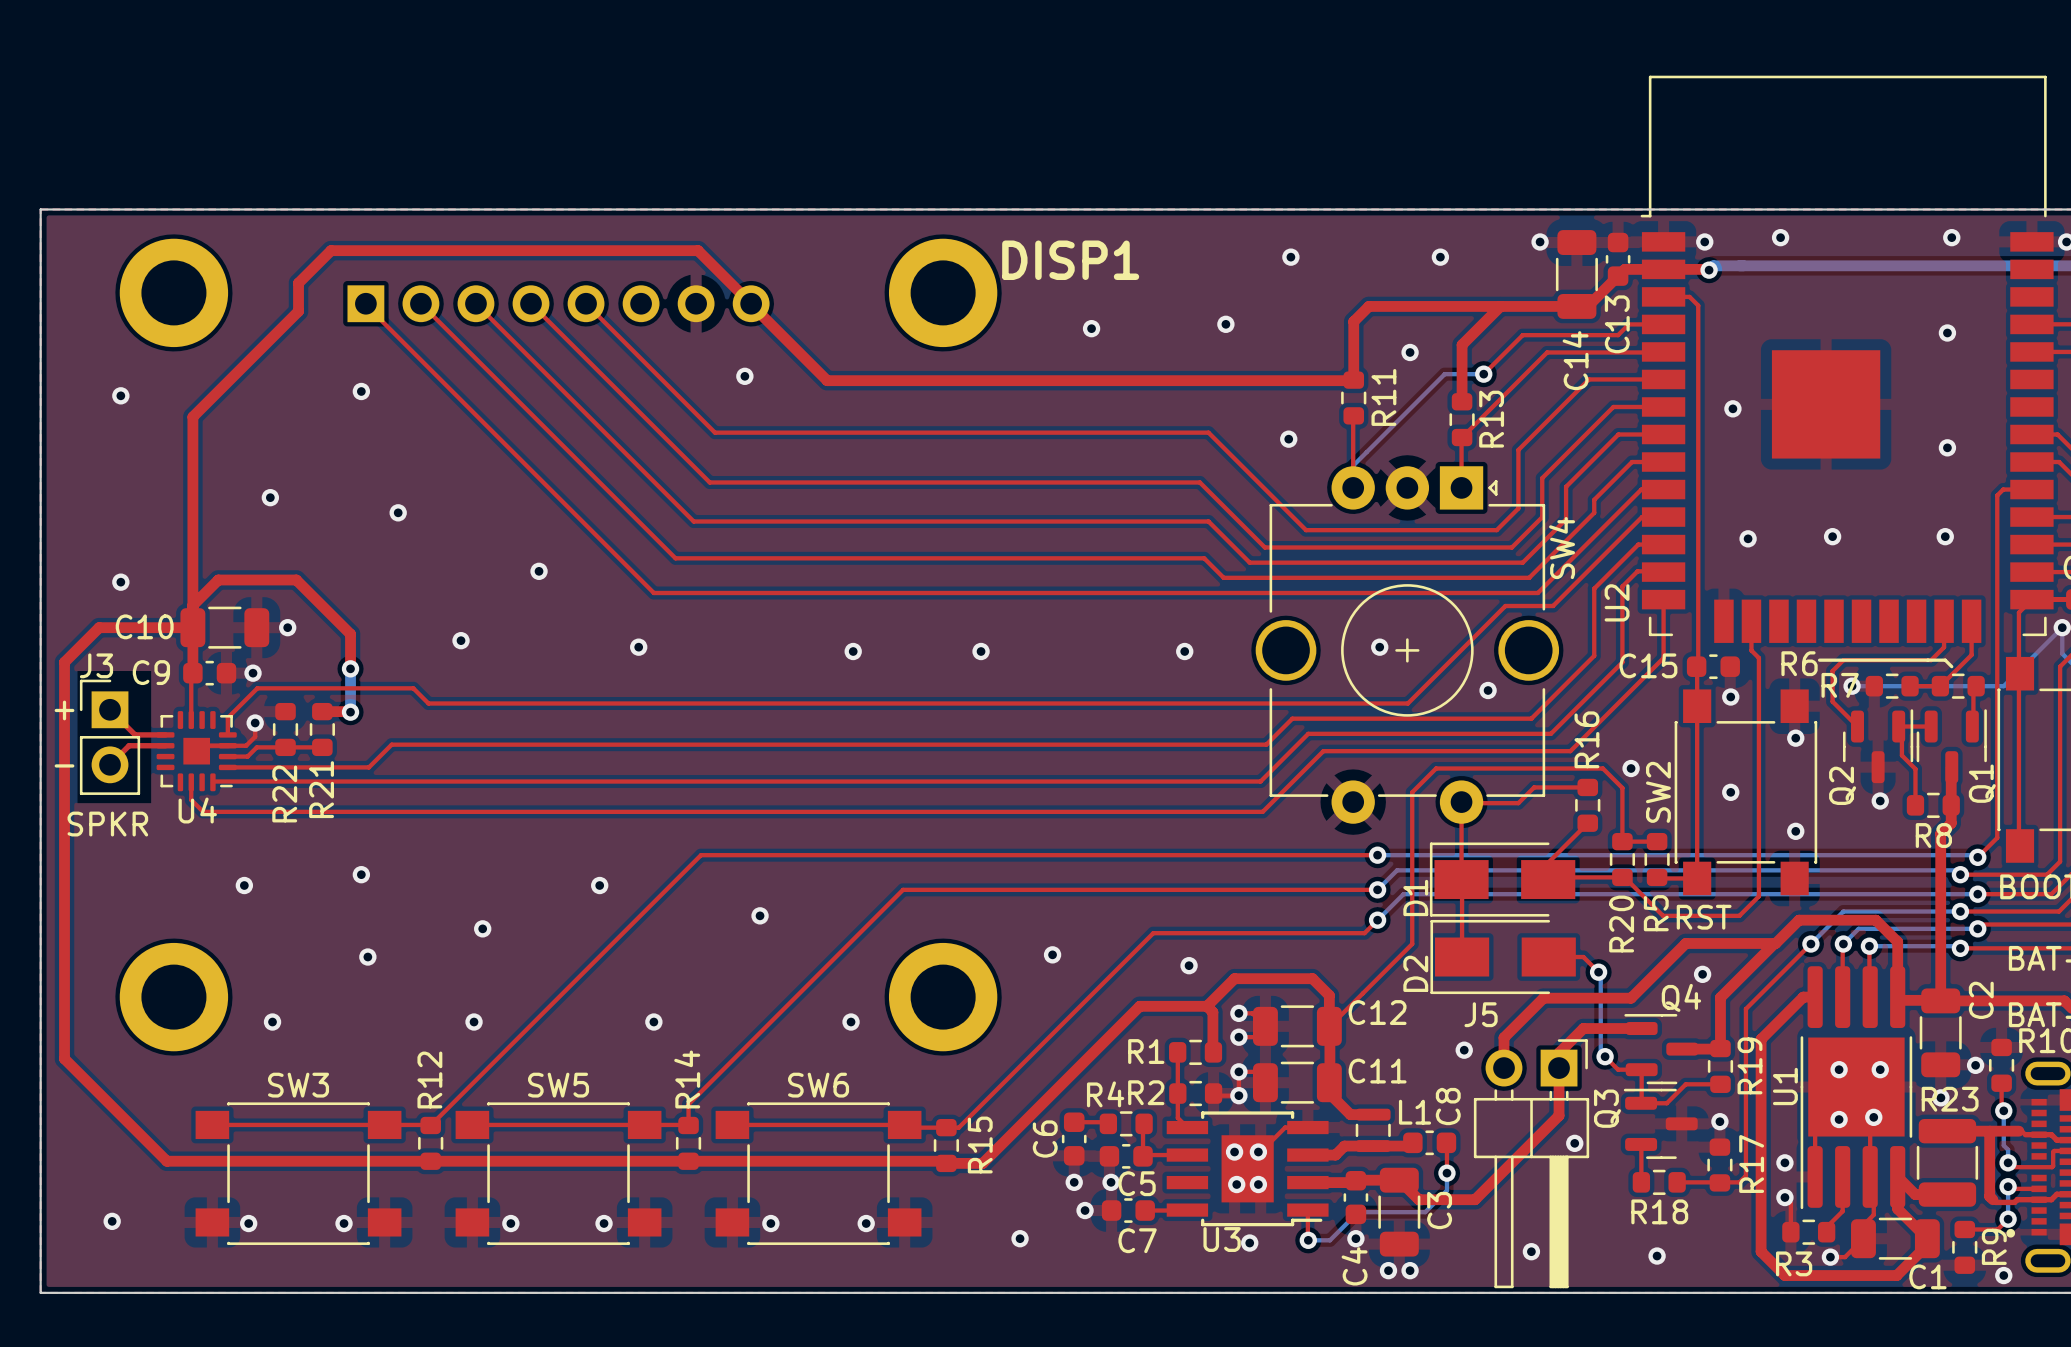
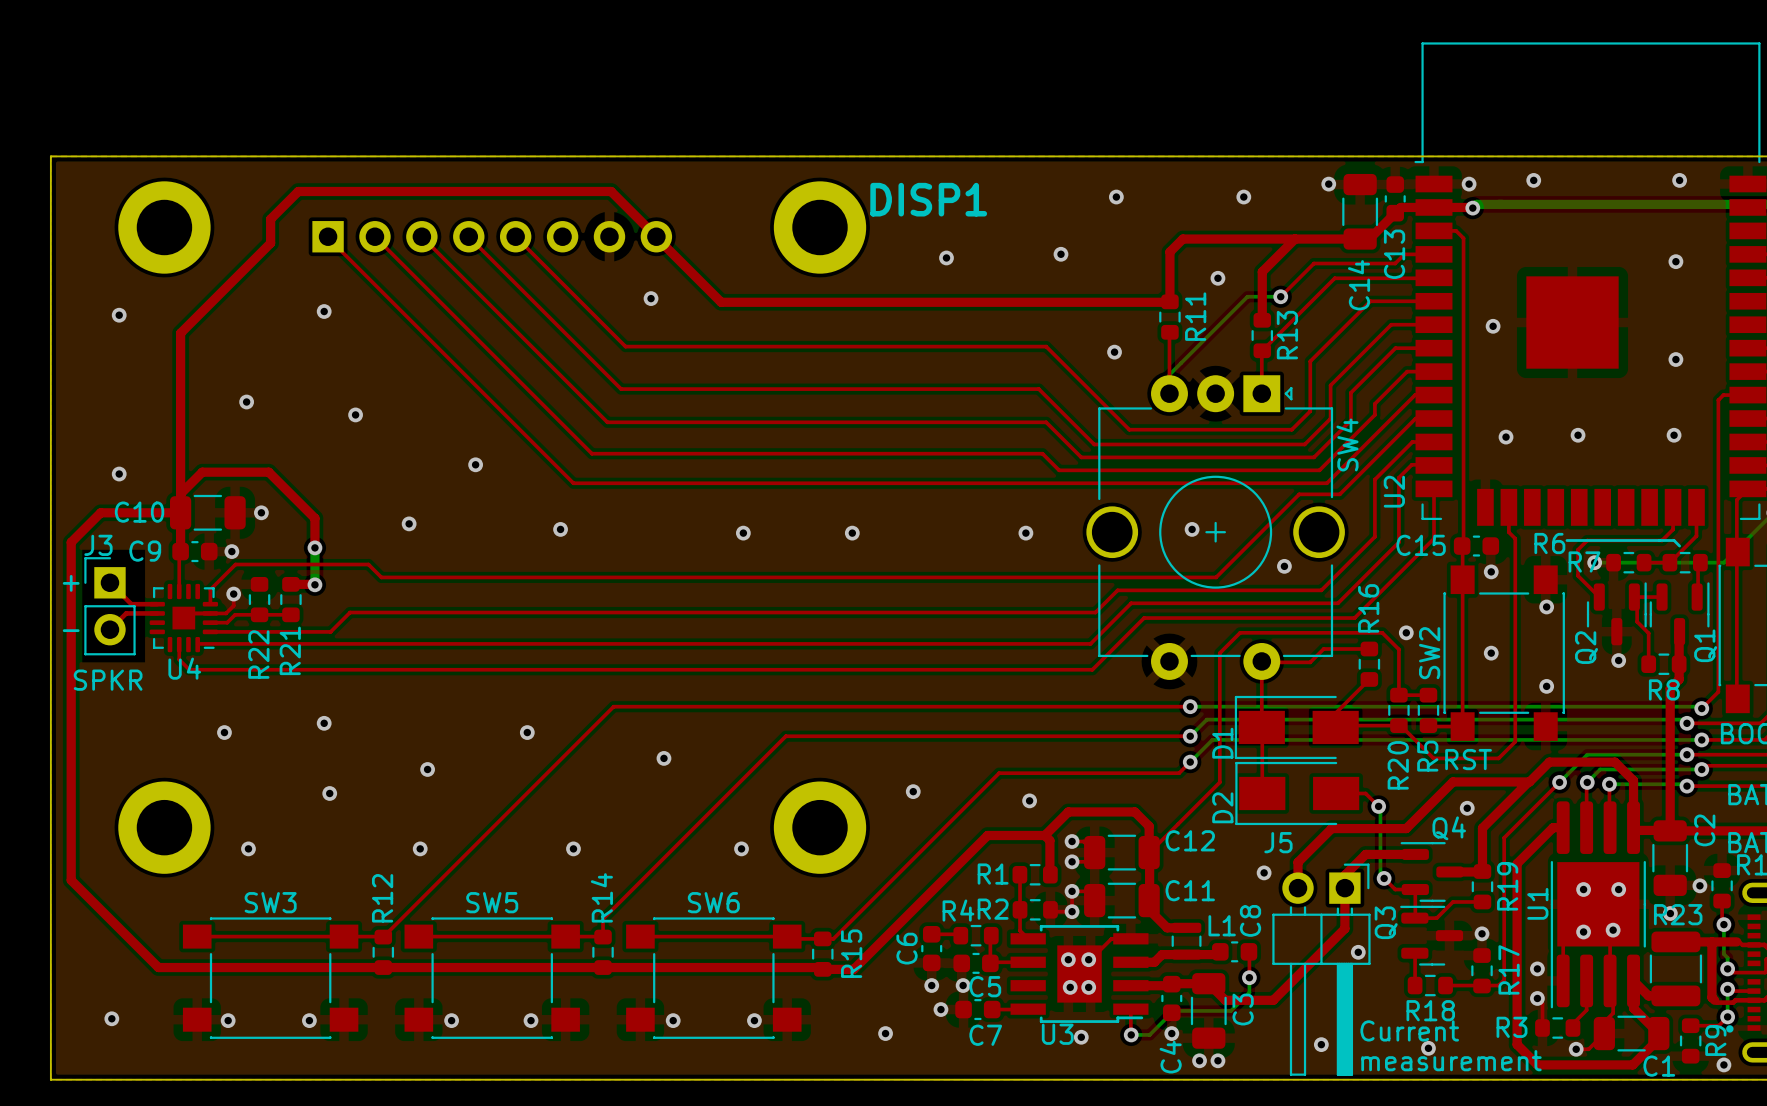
text: none -> Current (1409, 1030)
R3 name position: R3 (1794, 1263) -> R3 (1512, 1027)
text: none -> measurement (1451, 1060)

